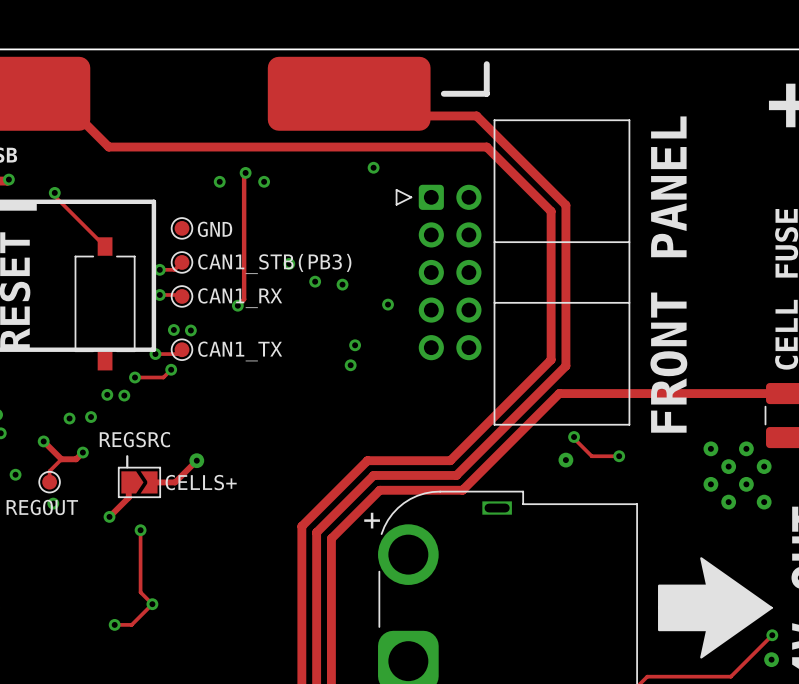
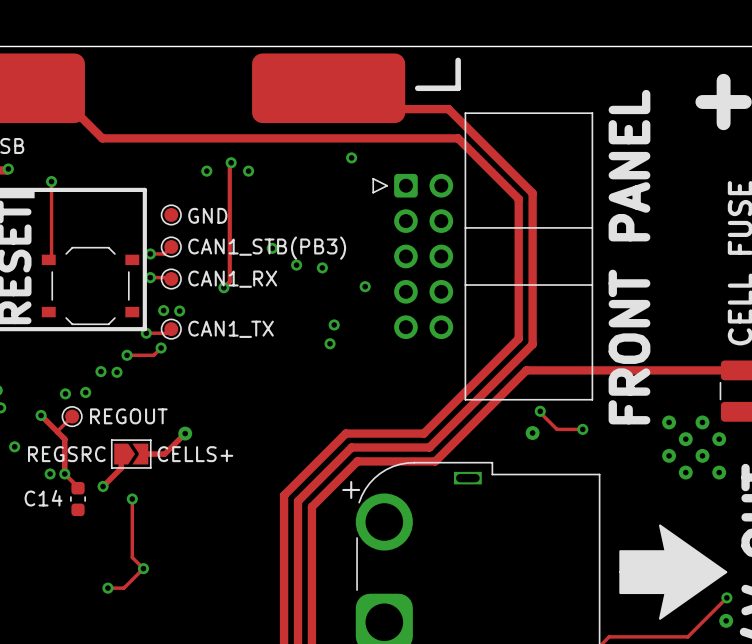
track: (54, 196) (105, 246) -> (51, 184) (51, 257) (48, 259)
part footprint: [74, 237, 136, 371] -> [41, 246, 140, 326]
text position: REGSRC (134, 439) -> REGSRC (66, 454)
track: none -> (72, 416) (57, 432) (64, 439) (64, 473) (78, 488)
track: (82, 452) (76, 459) (61, 459) (49, 471) (49, 482) -> none
via position: (82, 452) -> (64, 473)
line: (127, 456) (127, 467) -> none
part position: (49, 482) -> (72, 416)
text position: REGOUT (42, 507) -> REGOUT (128, 416)
C14: none -> (78, 499)

